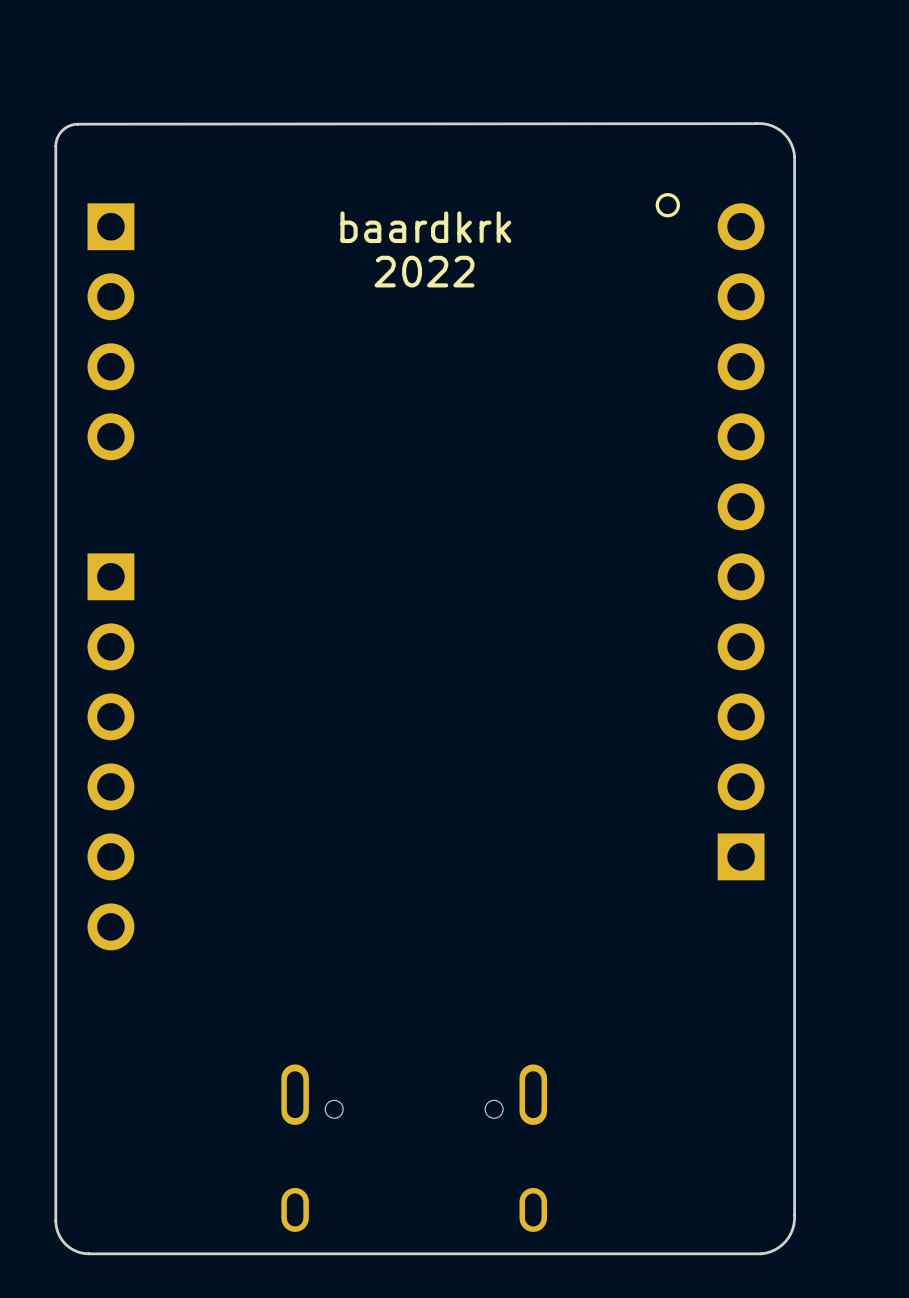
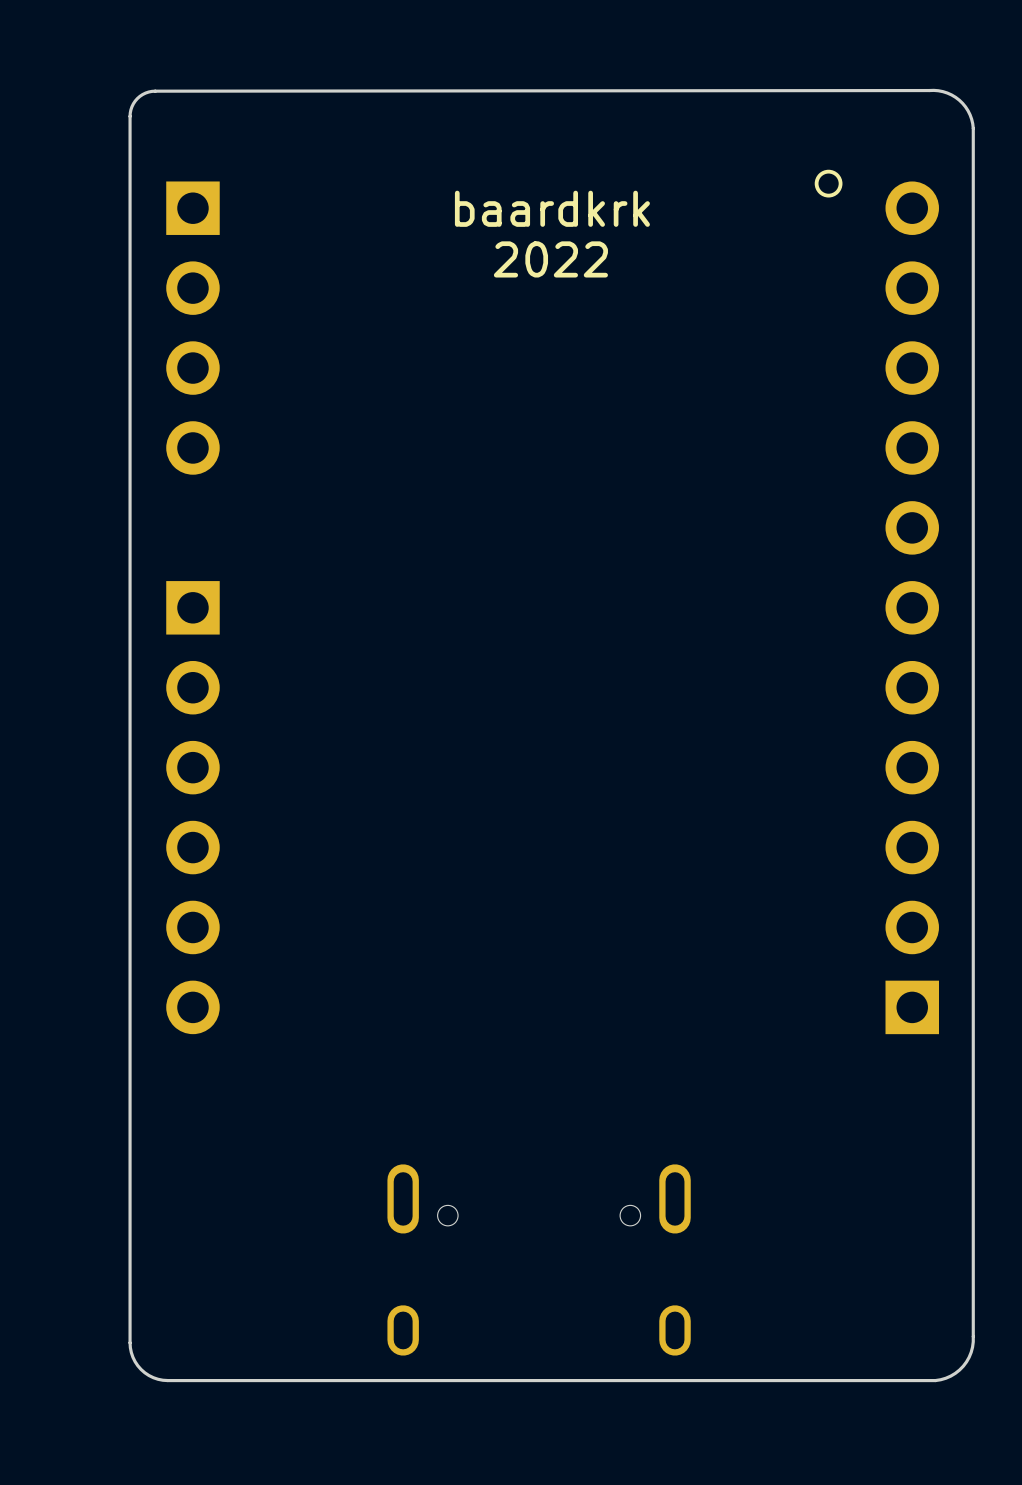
part: (741, 541) -> none
part: none -> (912, 607)

